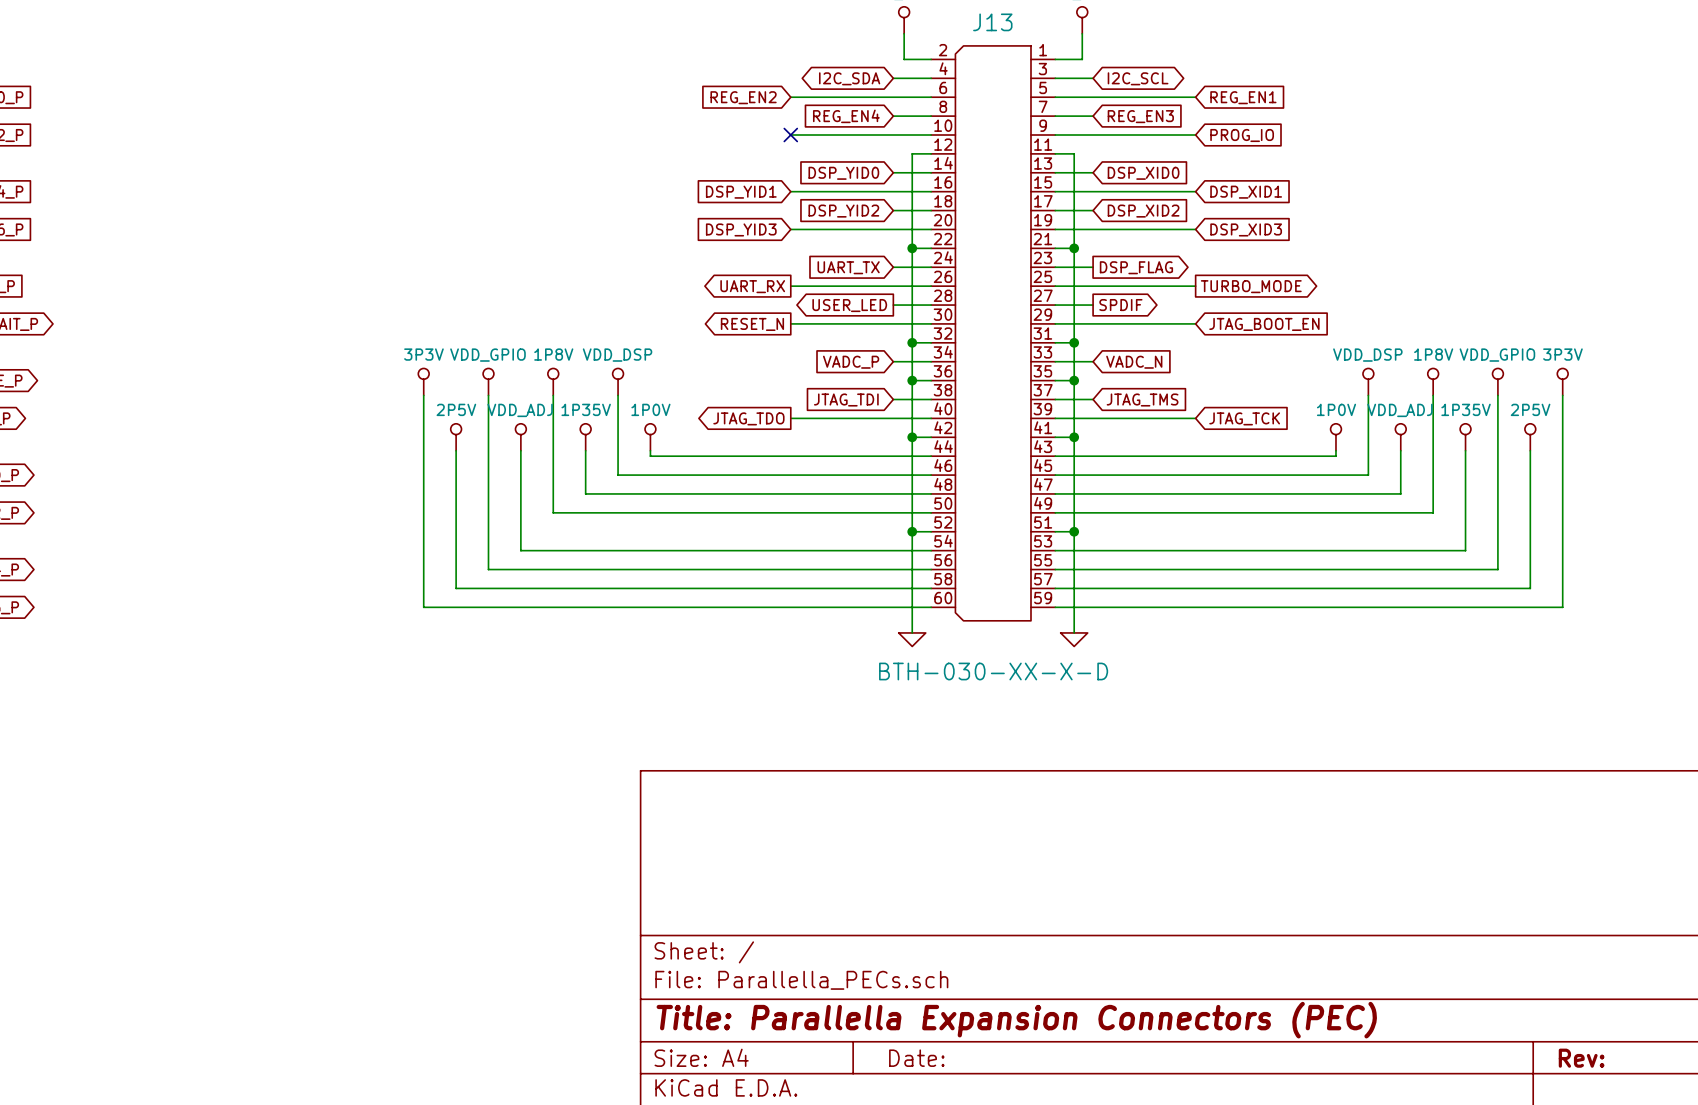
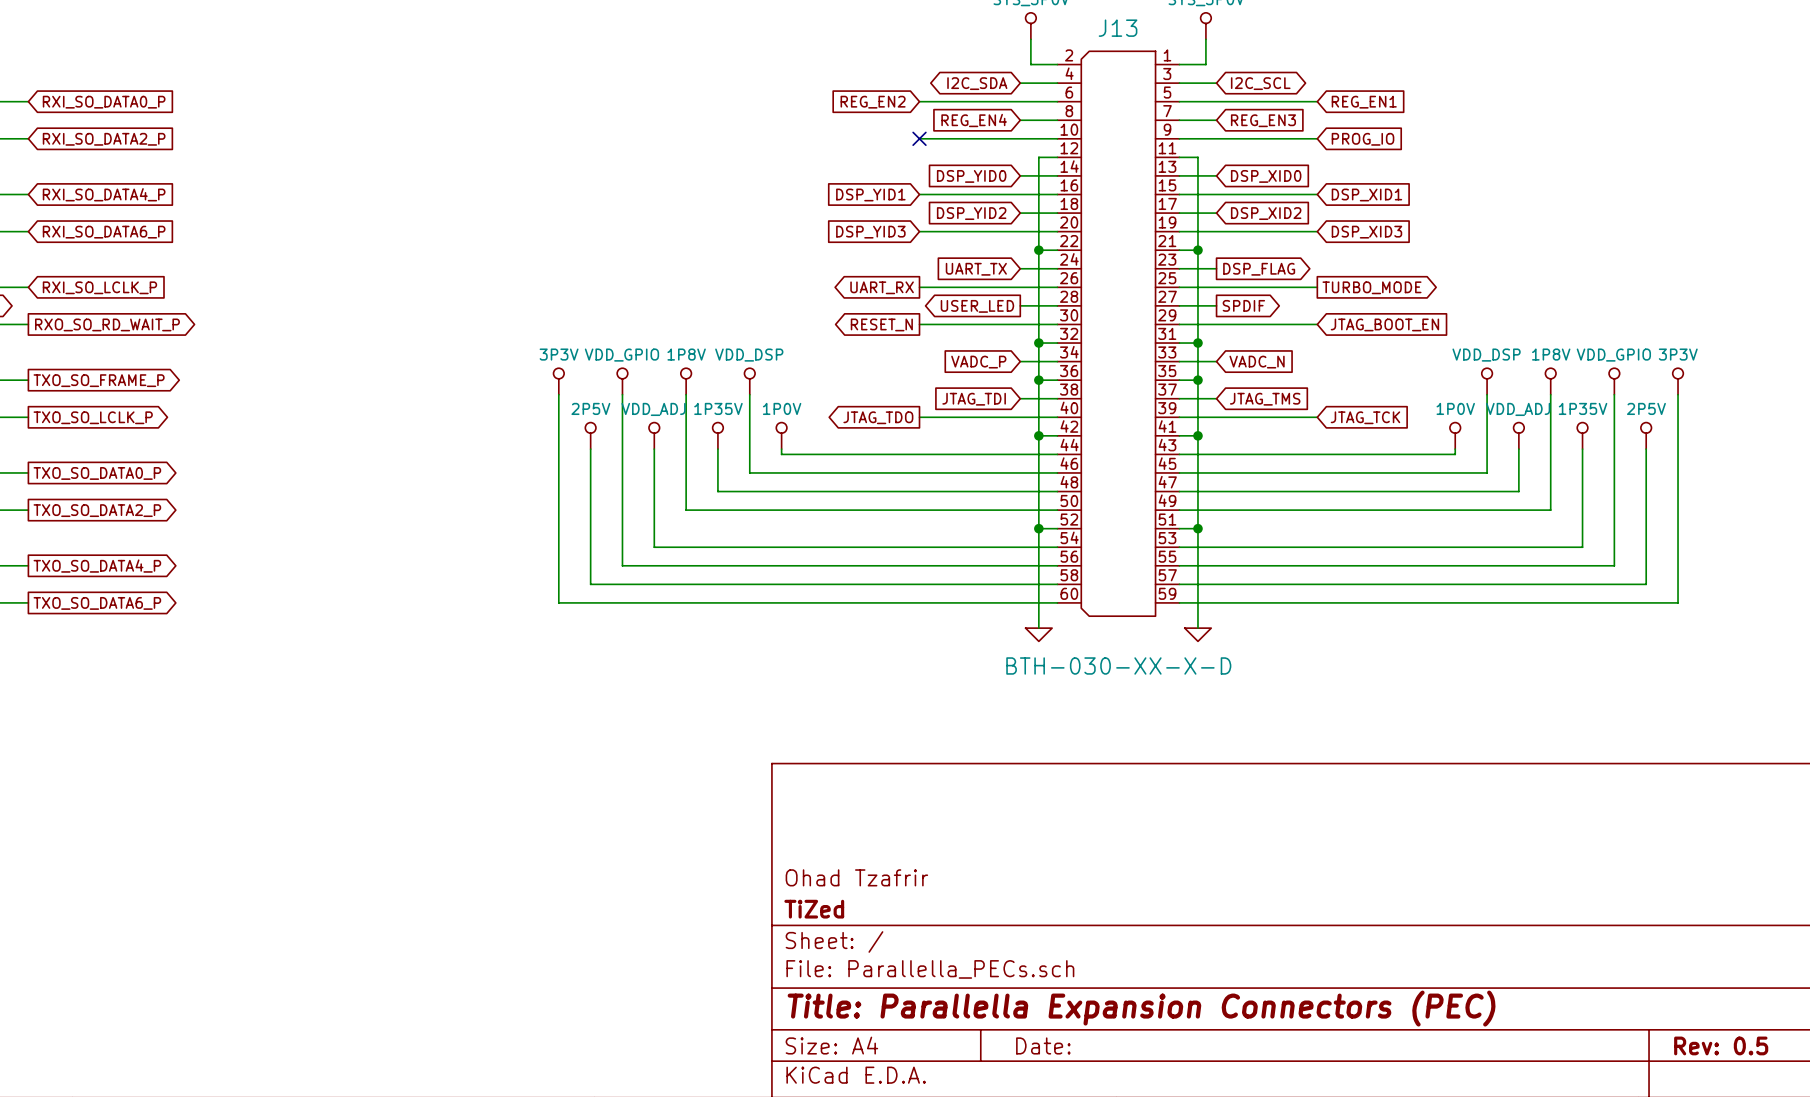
title block: none -> Ohad Tzafrir (856, 877)
title block: none -> TiZed (814, 909)
title block: Rev: (1581, 1058) -> Rev: 0.5 (1721, 1045)

